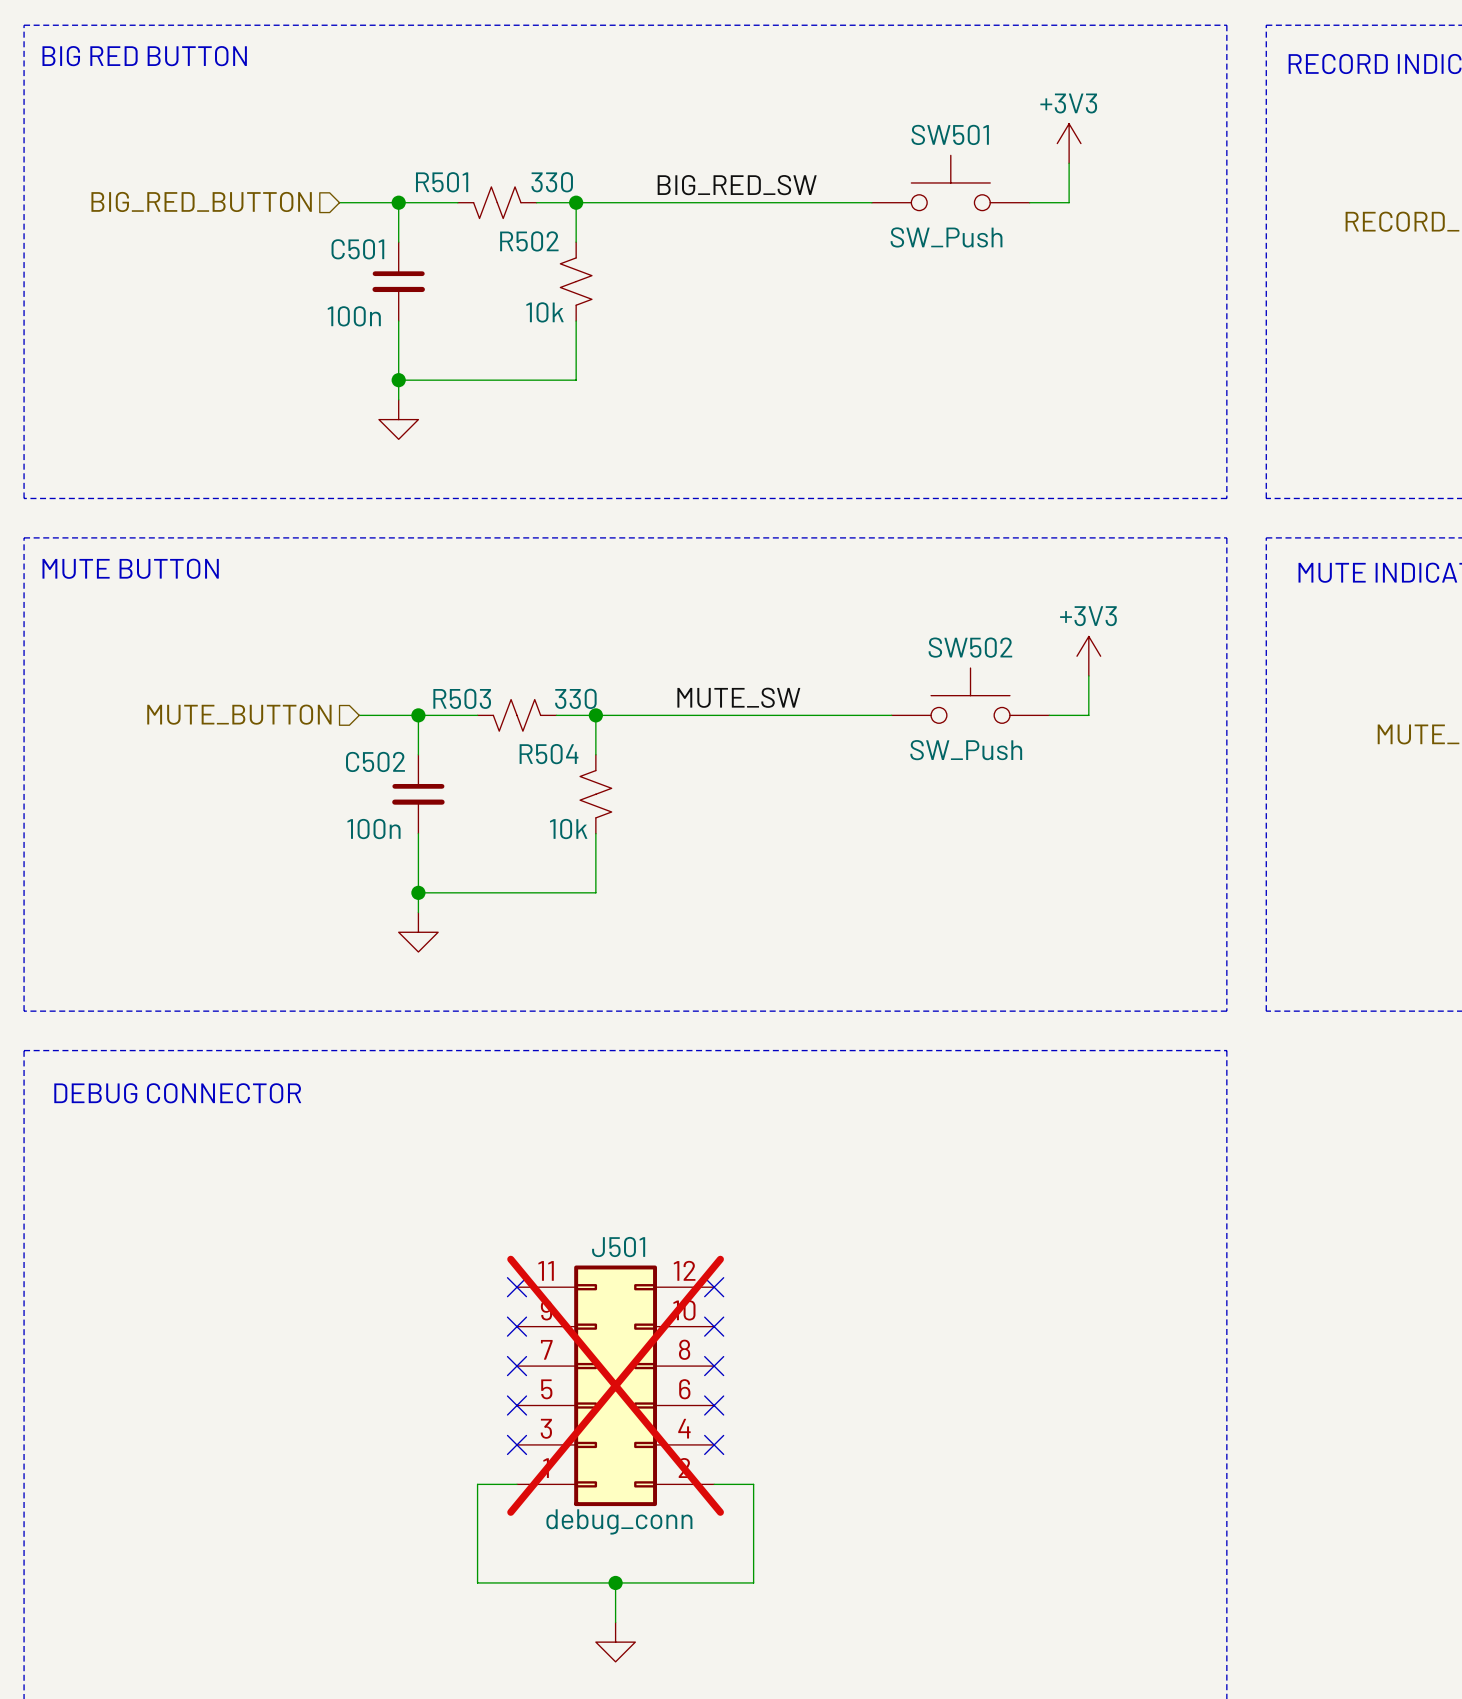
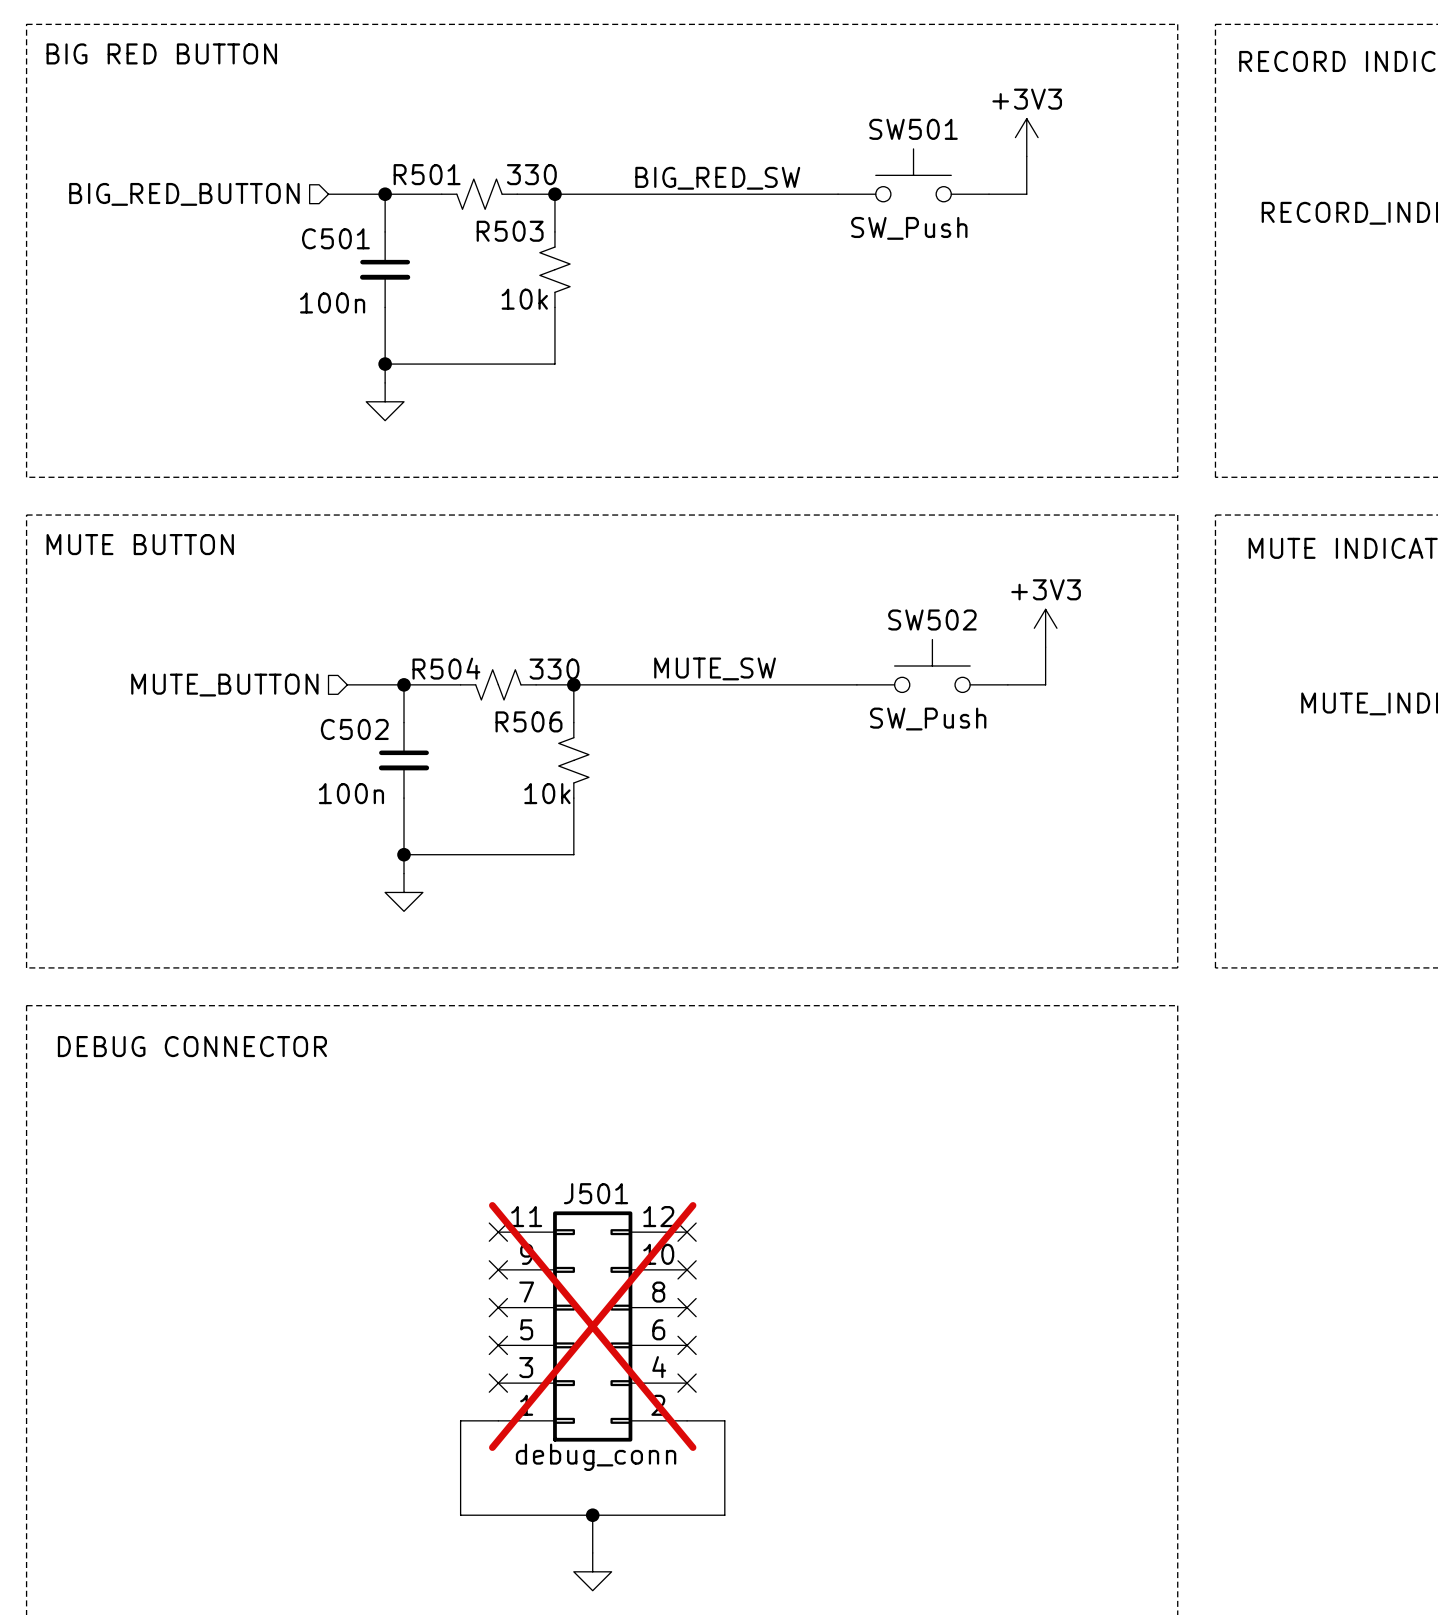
R502 name: R502 (529, 241) -> R503 (510, 231)
R503 name: R503 (462, 698) -> R504 (446, 668)
R504 name: R504 (549, 754) -> R506 (529, 721)

